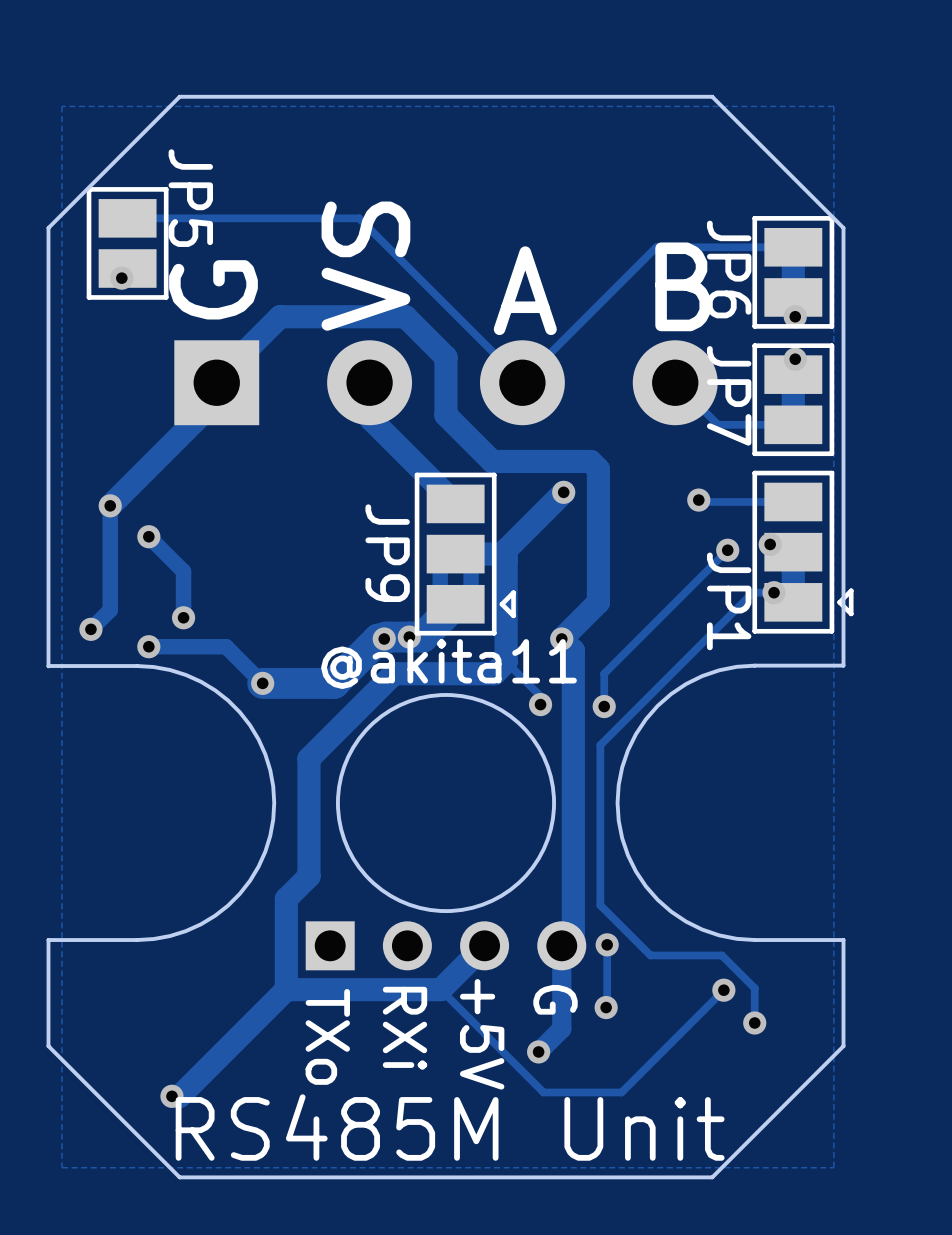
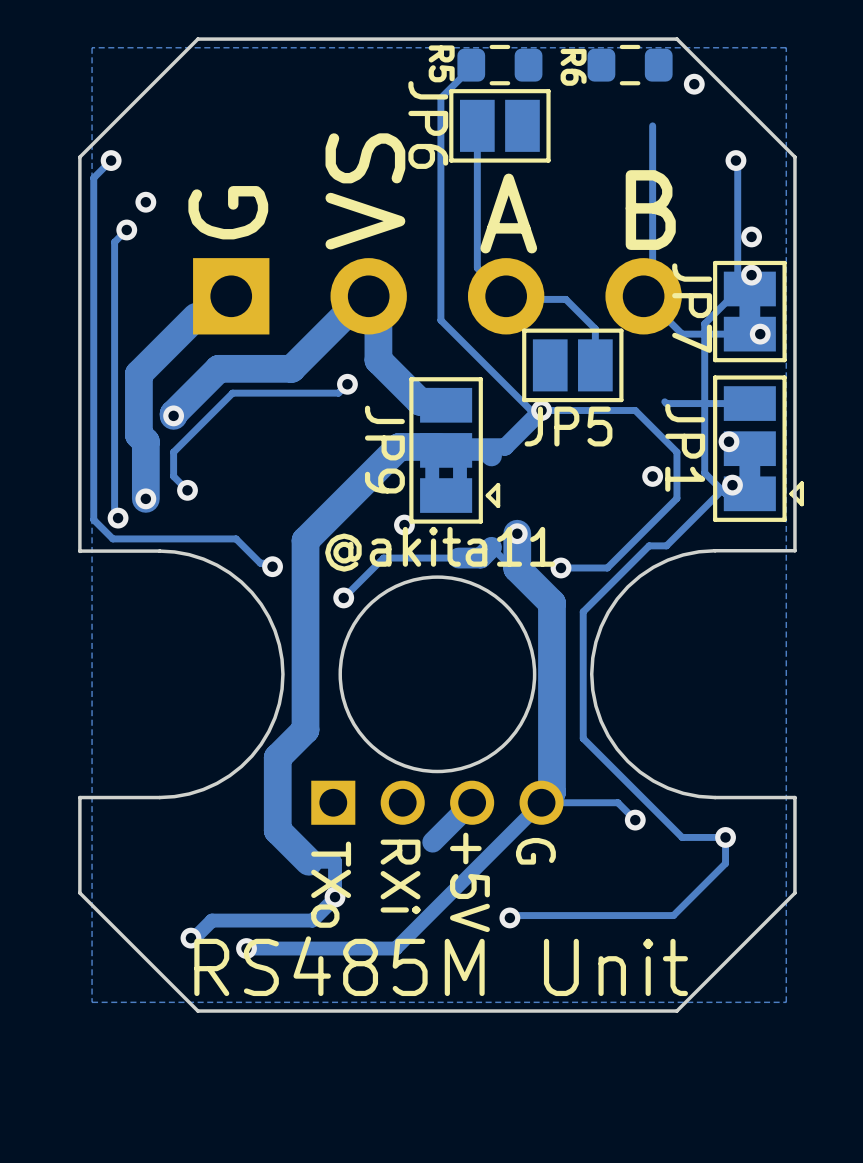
track: none -> (473, 65) (440, 98) (440, 320) (531, 410) (635, 410) (676, 452) (676, 498) (607, 567) (561, 567)
R5: none -> (499, 65)
R6: none -> (630, 65)
via: none -> (694, 84)
track: none -> (477, 125) (477, 268) (508, 299)
track: none -> (652, 125) (652, 285) (647, 290)
JP6 footprint: [752, 216, 835, 329] -> [449, 89, 551, 163]
track: (127, 218) (359, 218) (523, 382) -> none
track: none -> (111, 160) (93, 177) (93, 519) (112, 538) (236, 538) (260, 563) (263, 563)
via: none -> (111, 160)
track: none -> (735, 160) (737, 162) (737, 290) (704, 323) (704, 472) (725, 493) (749, 493)
via: none -> (735, 160)
JP5 rotation: 0° (127, 243) -> 90° clockwise (572, 365)
JP5 position: (127, 243) -> (572, 365)
track: (793, 247) (656, 247) (521, 382) -> none
track: none -> (126, 229) (114, 242) (114, 511)
via: none -> (126, 229)
track: (212, 382) (212, 403) (110, 505) (110, 610) (90, 629) -> none
track: (214, 384) (280, 316) (405, 316) (445, 357) (445, 415) (492, 461) (590, 461) (598, 469) (598, 602) (561, 639) (573, 650) (573, 723) -> (517, 533) (517, 568) (551, 603)
track: (370, 384) (370, 419) (455, 503) -> none
track: none -> (361, 299) (291, 368) (218, 368) (173, 415)
track: none -> (369, 299) (378, 308) (378, 360) (420, 401) (439, 401)
track: none -> (506, 299) (565, 299) (595, 328) (595, 365)
track: none -> (196, 316) (138, 374) (138, 434) (145, 441) (145, 498)
via: none -> (760, 334)
track: none -> (347, 384) (338, 393) (232, 393) (173, 452) (173, 476) (187, 490)
via: none -> (347, 384)
track: (563, 492) (506, 549) (506, 661) -> none
via position: (563, 492) -> (541, 410)
via: (698, 500) -> none
via: (110, 505) -> none
track: none -> (541, 410) (505, 446) (399, 446) (305, 540) (305, 729) (277, 757) (277, 830) (308, 861) (335, 861) (335, 898) (312, 920) (212, 920) (194, 938)
track: (148, 536) (183, 571) (183, 617) -> none
via position: (148, 536) -> (173, 415)
track: (727, 550) (604, 673) (604, 706) -> none
via: (727, 550) -> none
via: none -> (652, 476)
track: (774, 592) (752, 592) (600, 745) (600, 905) (650, 955) (721, 955) (754, 988) (754, 1023) -> none
track: none -> (722, 490) (666, 545) (649, 545) (583, 611) (583, 738) (682, 837) (725, 837) (725, 863) (673, 915) (512, 915) (509, 917)
JP1 name position: JP1 (729, 601) -> JP1 (685, 447)
via: none -> (145, 498)
track: (451, 608) (422, 637) (386, 637) (378, 639) (334, 683) (262, 683) (226, 646) (148, 646) -> none
via position: (183, 617) -> (187, 490)
via: (384, 639) -> none
via: (561, 639) -> none
via: (148, 646) -> none
via: none -> (517, 533)
track: (393, 673) (308, 758) (308, 876) (286, 898) (286, 989) -> (390, 558) (383, 558) (343, 597)
track width: thick (494, 673) (393, 673) -> thin (480, 558) (390, 558)
via: (540, 704) -> none
via position: (604, 706) -> (561, 567)
via: none -> (343, 597)
track width: thin (573, 723) (573, 934) (561, 945) -> thick (551, 603) (551, 792) (541, 802)
track: (607, 944) (606, 1007) -> none
via: (607, 944) -> none
track: (561, 945) (561, 1028) (538, 1051) -> none
track: none -> (635, 820) (617, 802) (541, 802) (395, 948) (246, 948)
via: none -> (635, 820)
via: none -> (725, 837)
track: (286, 989) (440, 989) (543, 1092) (621, 1092) (723, 990) -> none
track: (286, 989) (179, 1096) (171, 1096) -> none
via: (723, 990) -> none
via: (606, 1007) -> none
via: (754, 1023) -> none
via: none -> (335, 897)
via position: (538, 1051) -> (509, 917)
via: none -> (246, 948)

